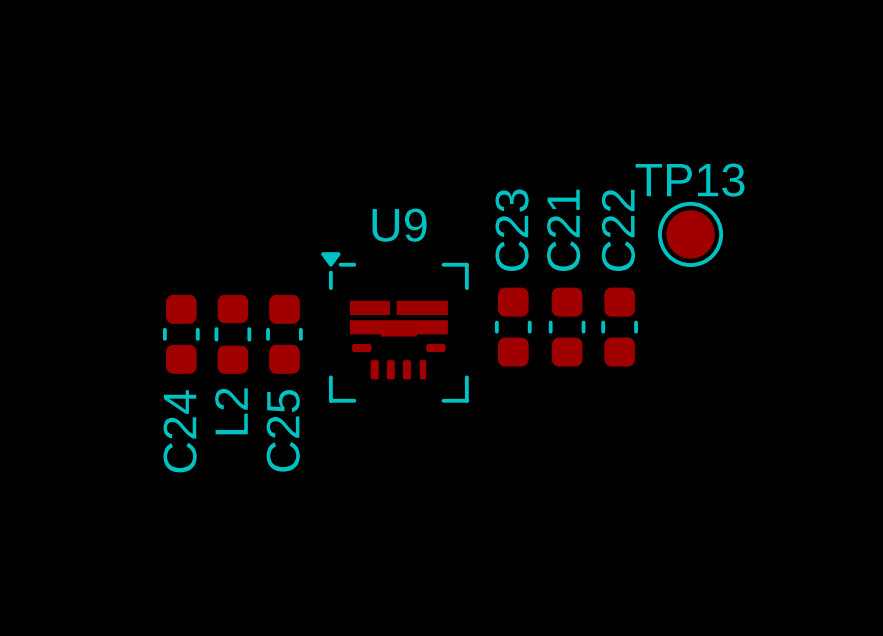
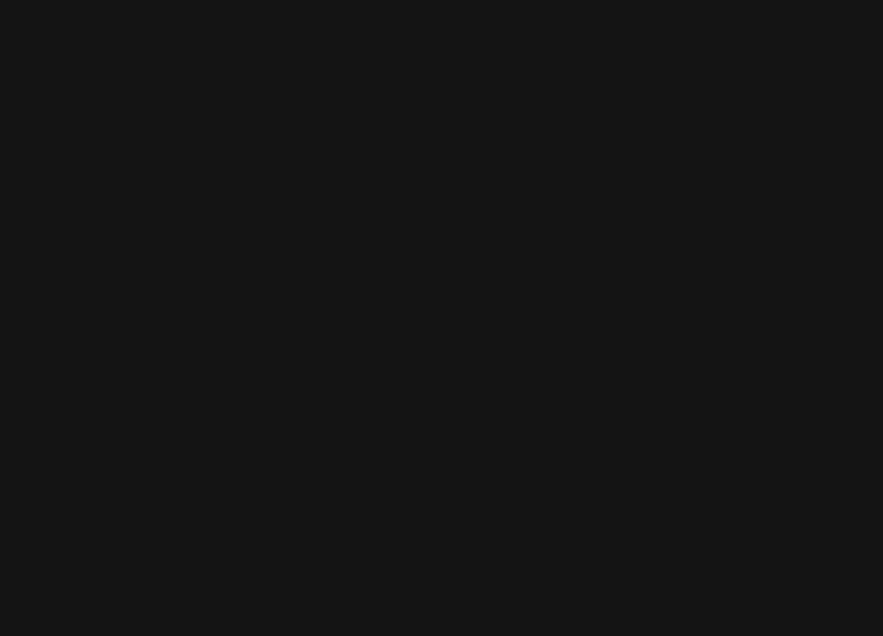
TP13: (690, 234) -> none
U9: (395, 327) -> none
C23: (513, 327) -> none
C21: (567, 327) -> none
C22: (619, 327) -> none
C24: (181, 334) -> none
L2: (232, 334) -> none
C25: (284, 334) -> none

